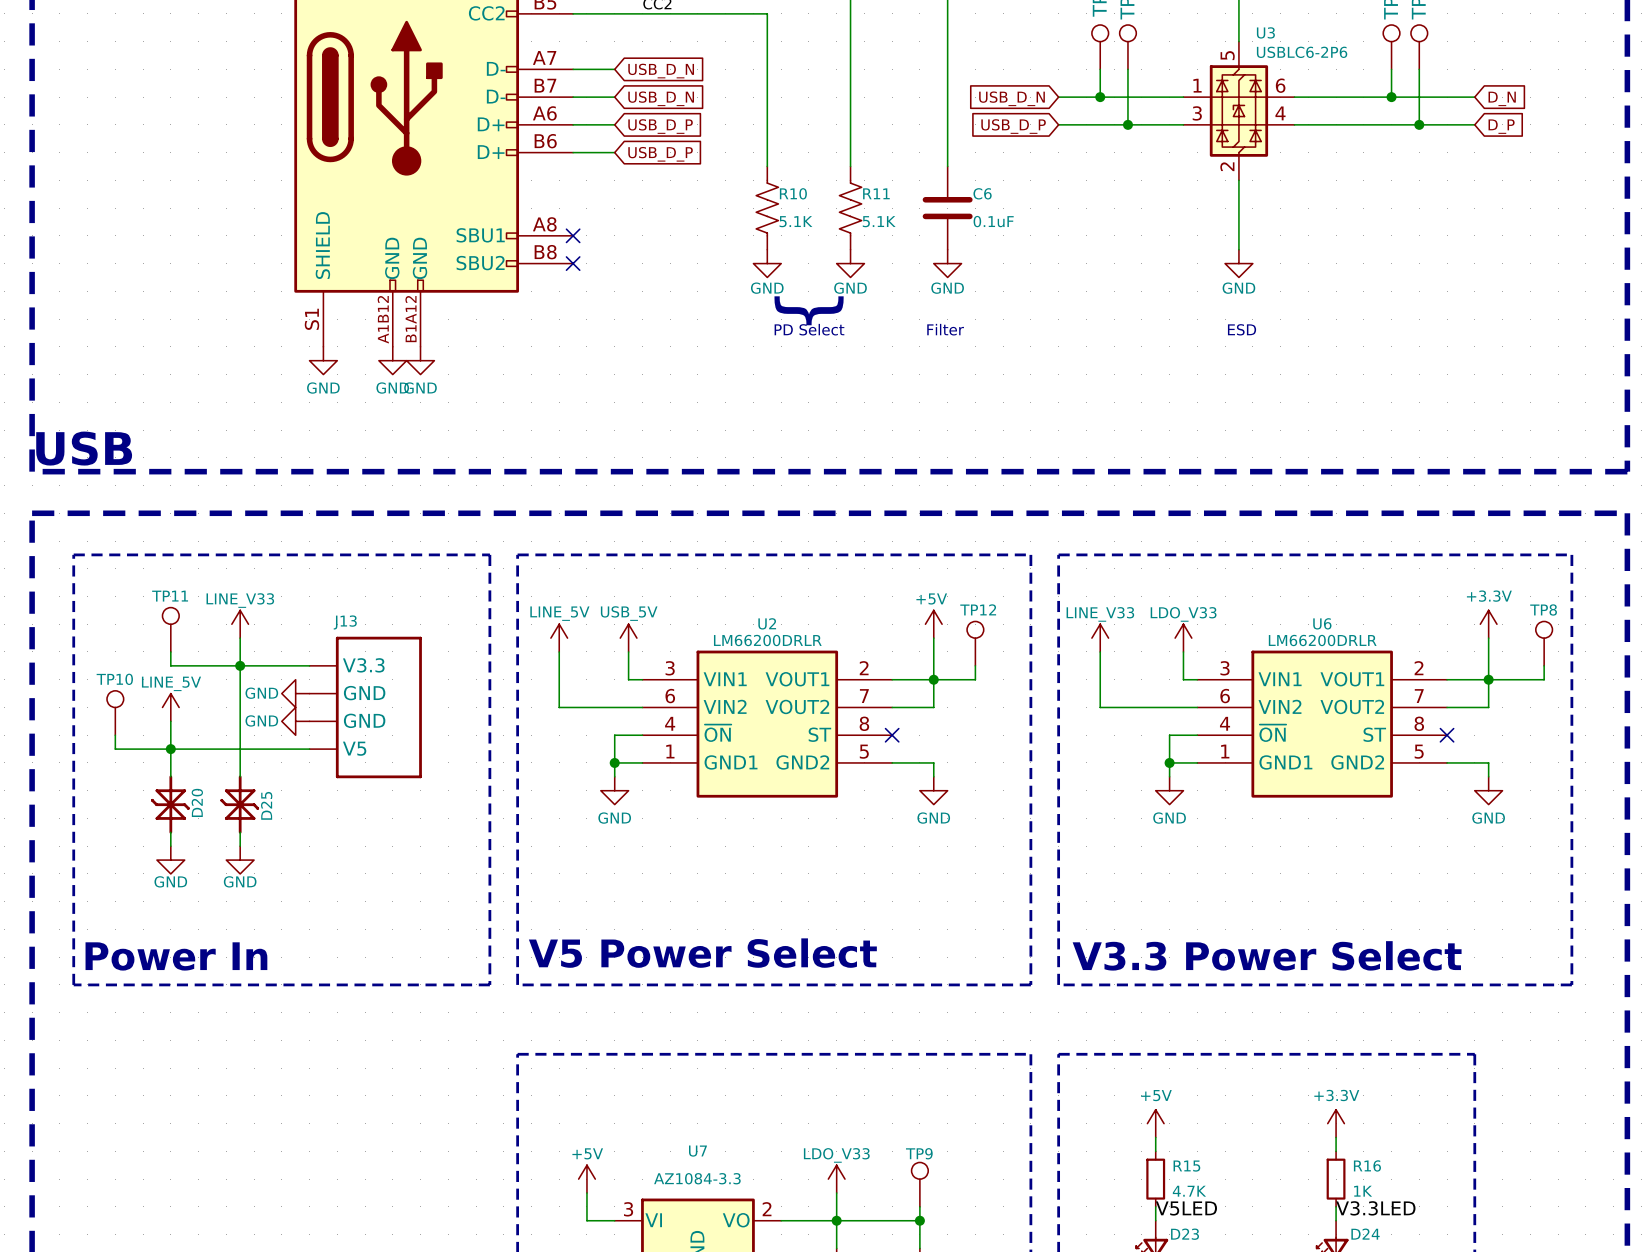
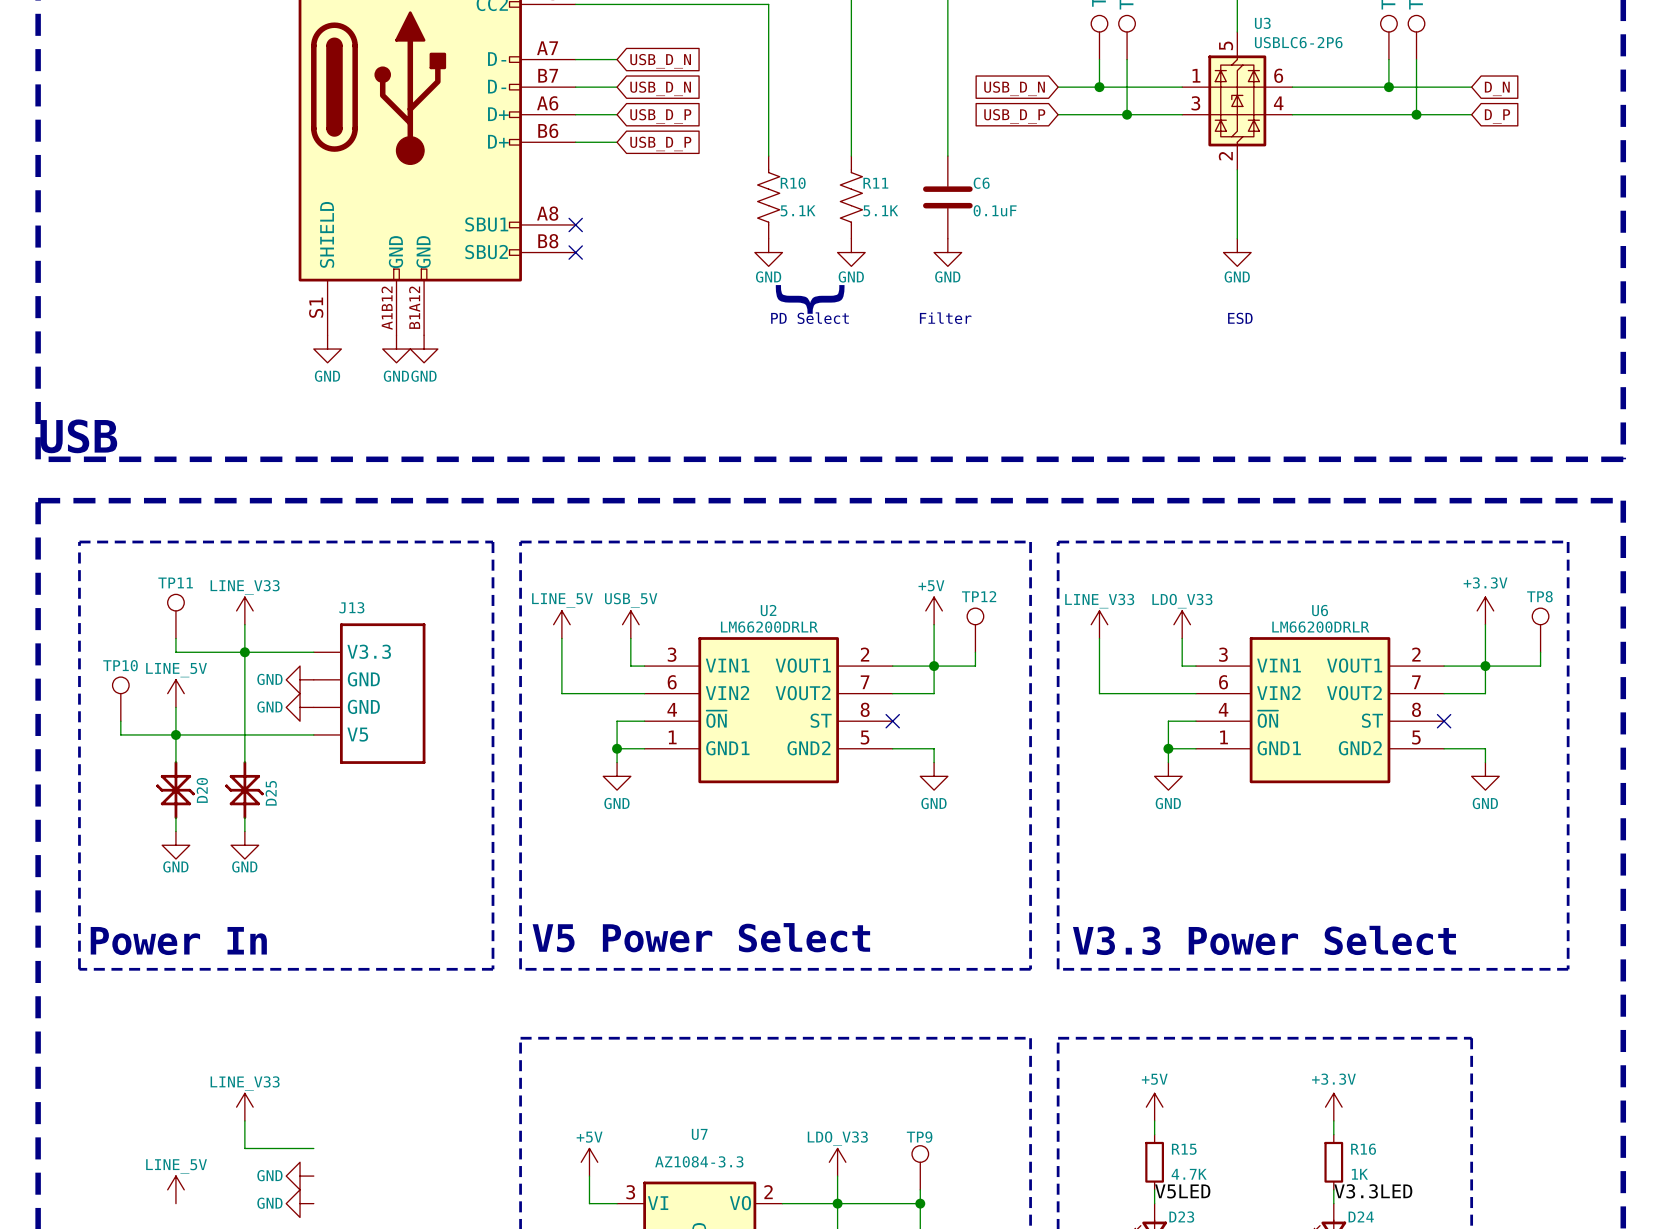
power symbol: none -> LINE_V33 (244, 1107)
wire: none -> (244, 1120) (244, 1148) (313, 1148)
power symbol: none -> GND (300, 1176)
power symbol: none -> LINE_5V (175, 1189)
power symbol: none -> GND (300, 1203)

